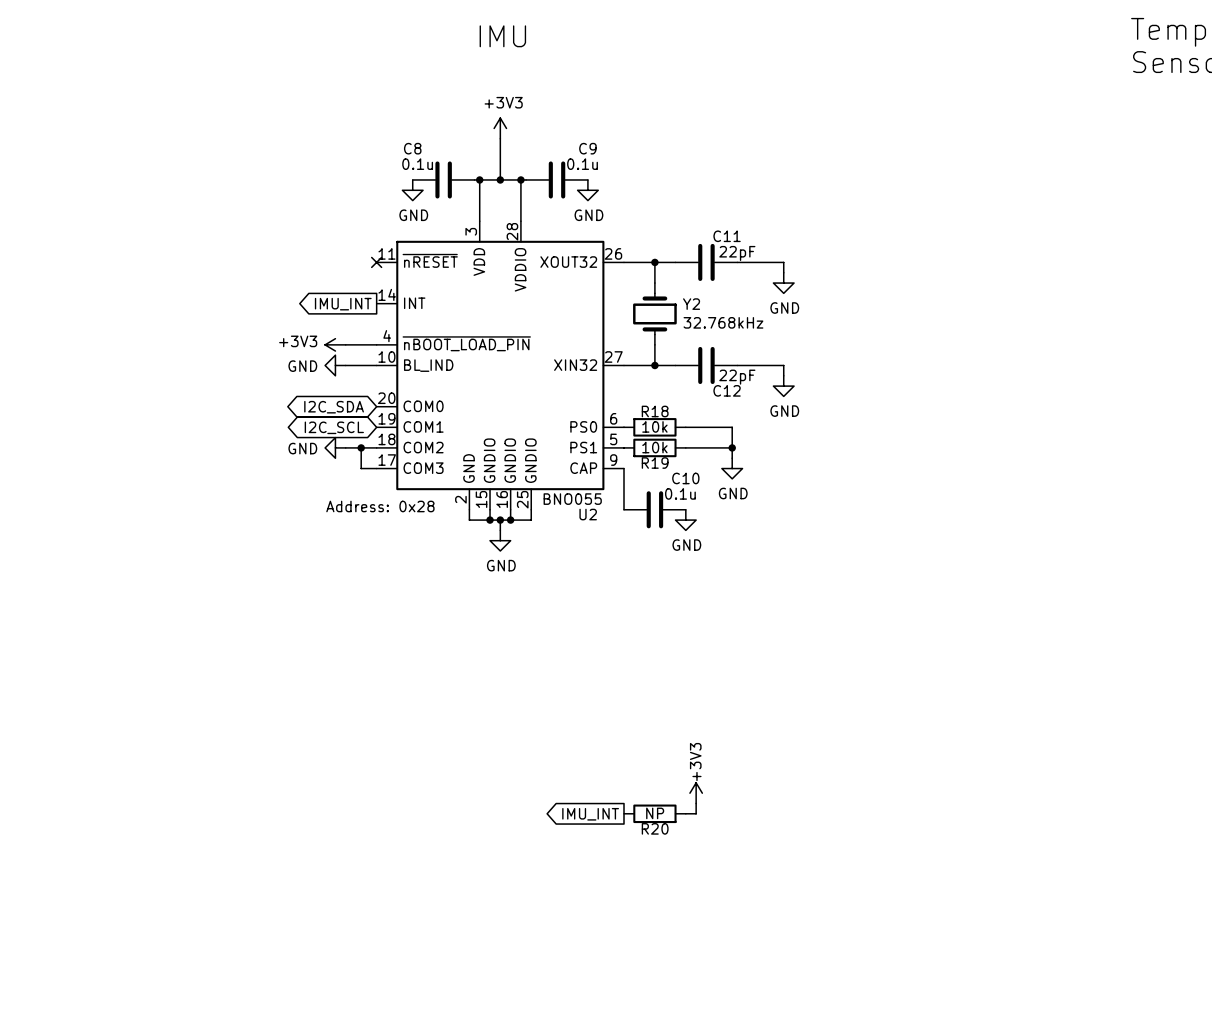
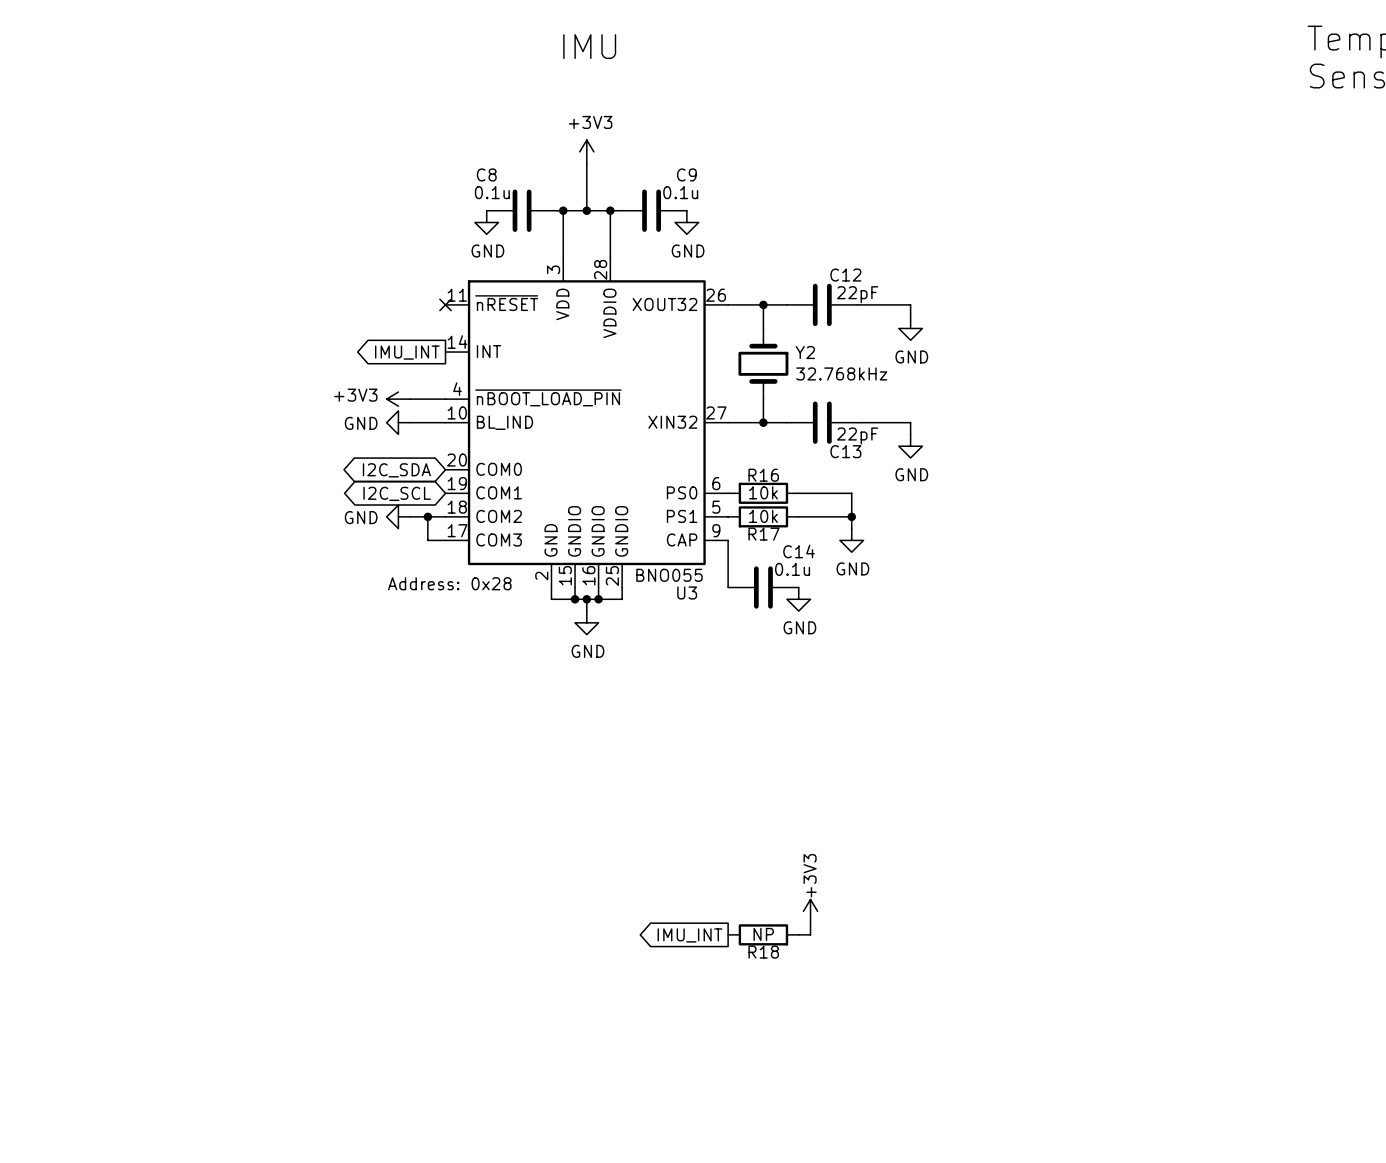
C11 name: C11 (727, 236) -> C12 (845, 275)
C12 name: C12 (727, 390) -> C13 (845, 451)
R18 name: R18 (655, 411) -> R16 (763, 475)
R19 name: R19 (655, 463) -> R17 (763, 534)
C10 name: C10 (685, 478) -> C14 (799, 551)
U2 name: U2 (588, 514) -> U3 (687, 592)
R20 name: R20 (655, 828) -> R18 (763, 952)

